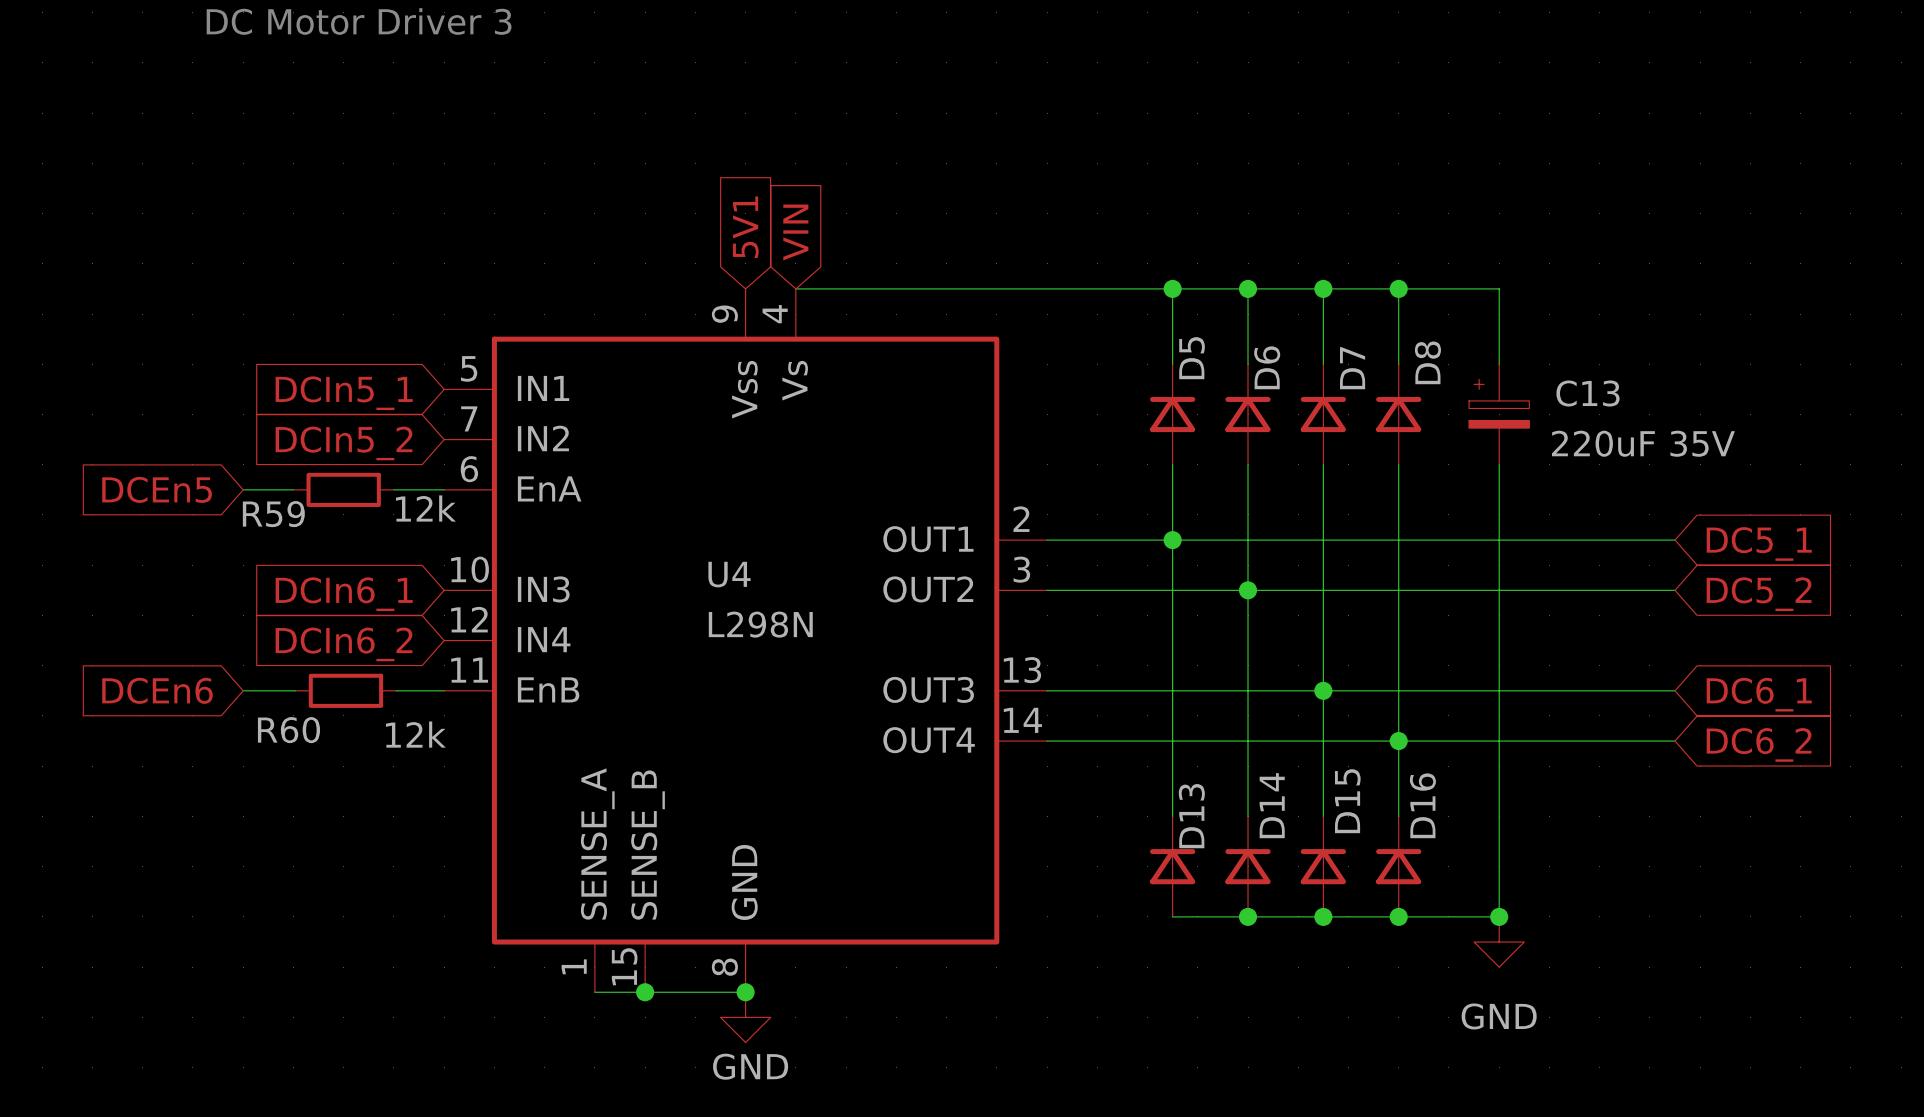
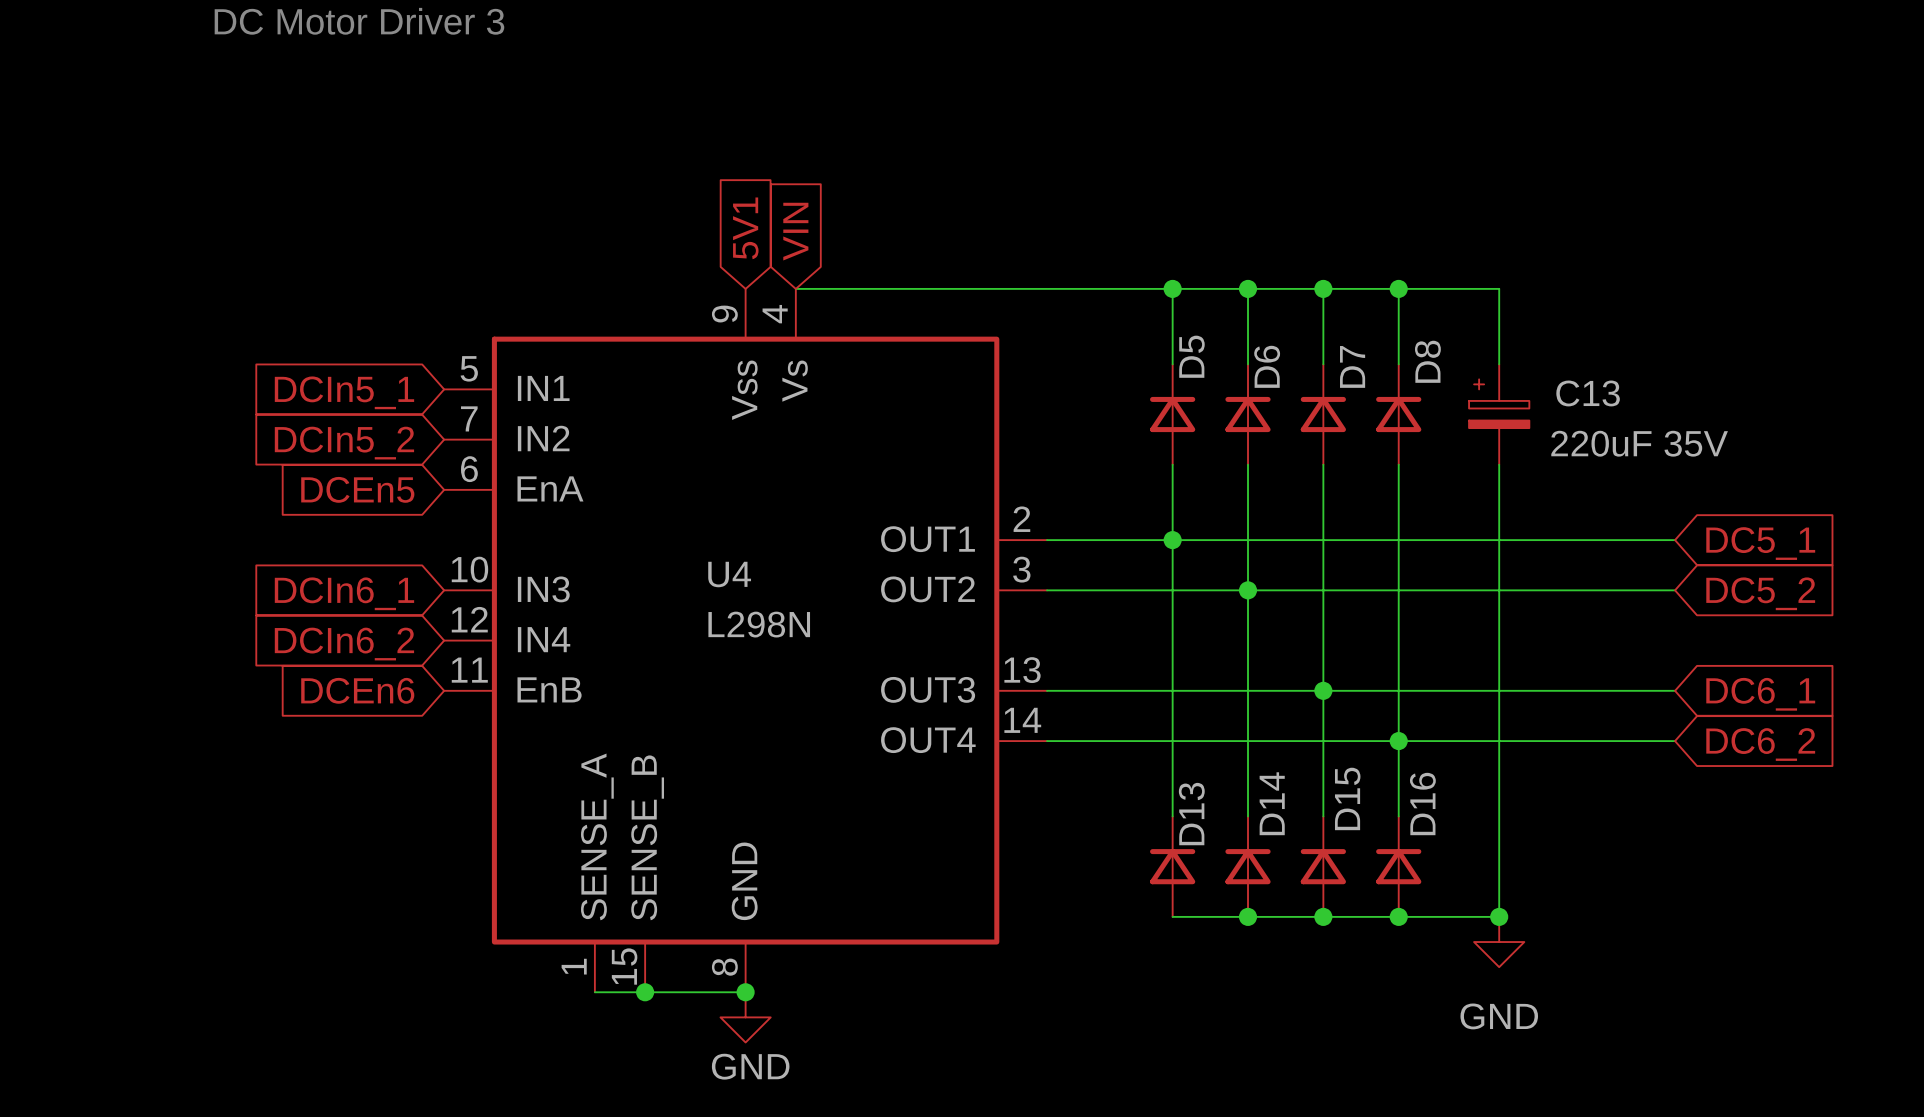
global label position: DCEn5 (157, 489) -> DCEn5 (357, 489)
wire: (243, 489) (293, 489) -> none
R59: 12k (343, 489) -> none
wire: (393, 489) (444, 489) -> none
global label position: DCEn6 (157, 690) -> DCEn6 (357, 690)
wire: (243, 690) (295, 690) -> none
R60: 12k (345, 690) -> none
wire: (396, 690) (444, 690) -> none

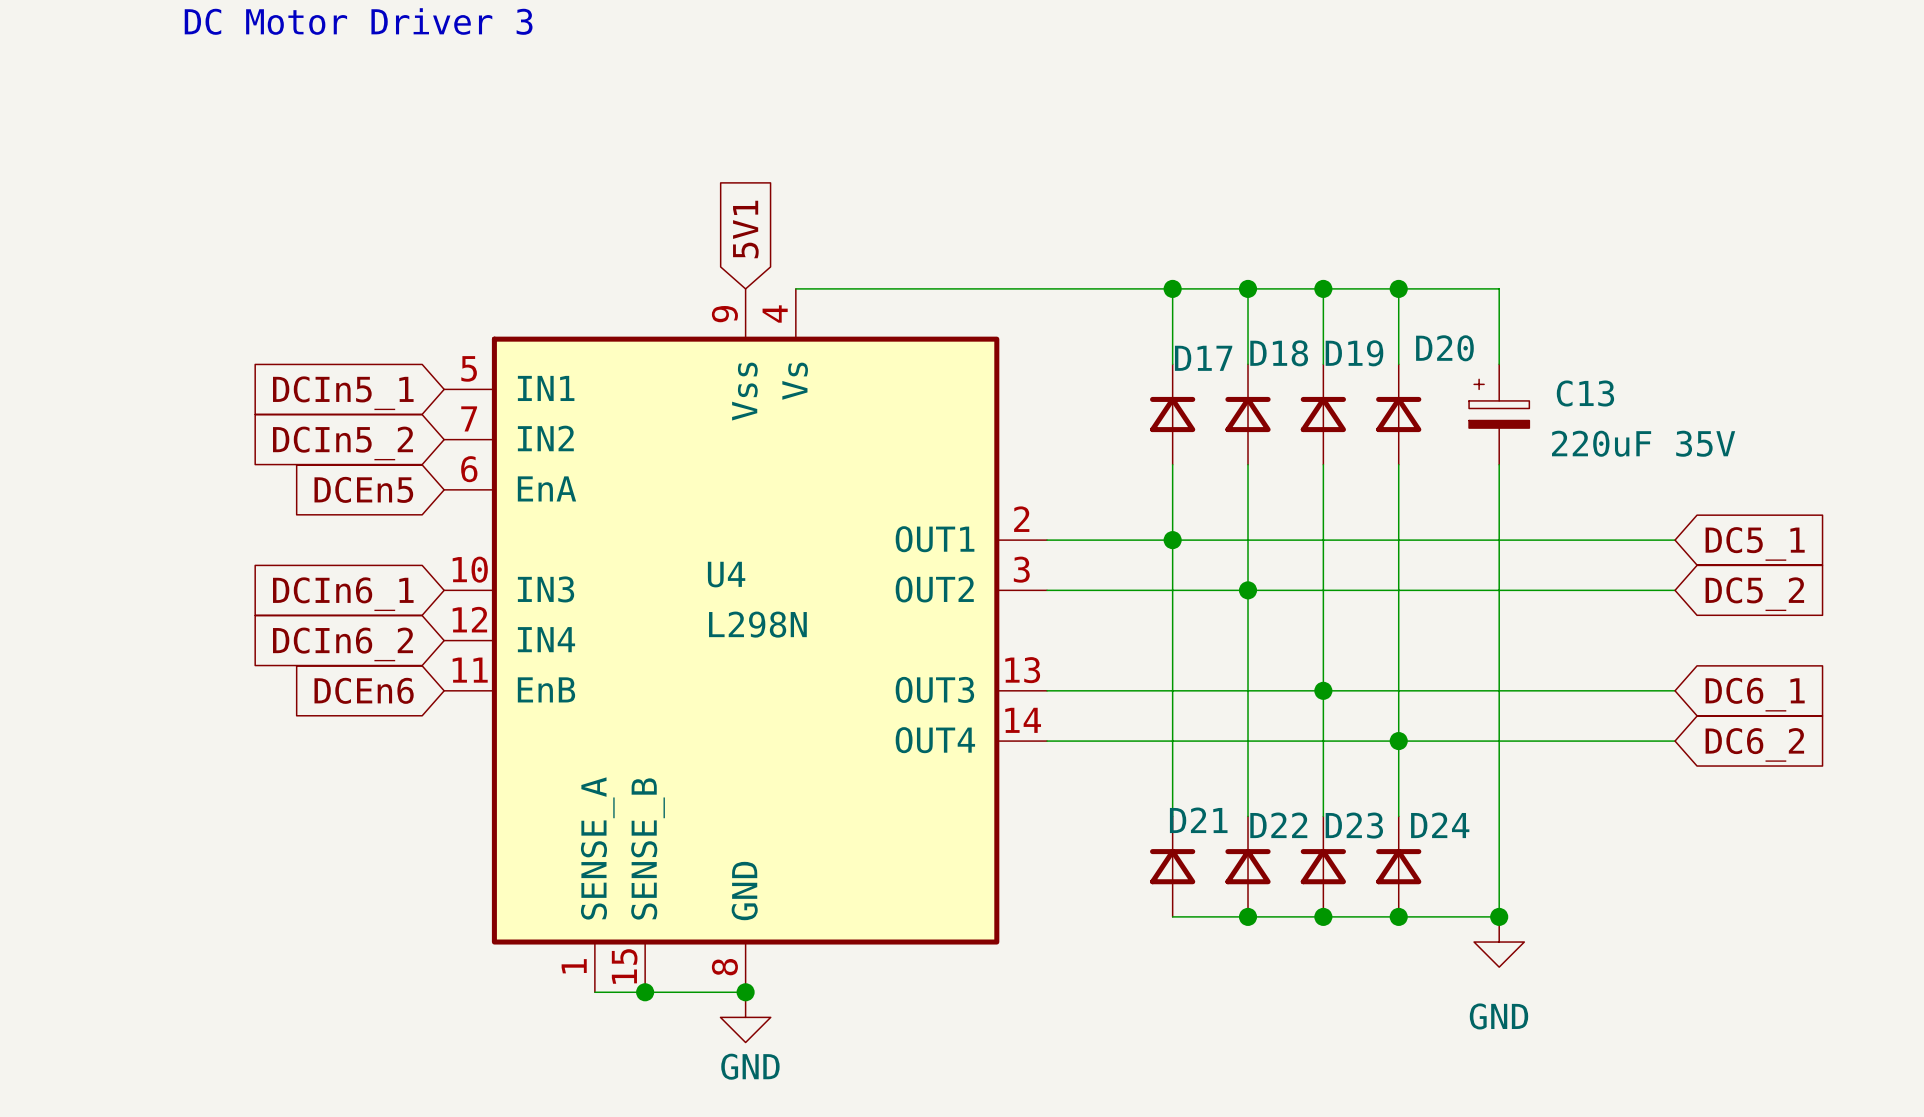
global label: VIN (795, 231) -> none
D5 name: D5 (1191, 356) -> D17 (1203, 358)
D8 name: D8 (1427, 361) -> D20 (1444, 348)
D6 name: D6 (1267, 366) -> D18 (1279, 353)
D7 name: D7 (1352, 366) -> D19 (1354, 353)
D15 name: D15 (1347, 798) -> D23 (1354, 825)
D14 name: D14 (1272, 803) -> D22 (1278, 825)
D16 name: D16 (1422, 804) -> D24 (1440, 825)
D13 name: D13 (1191, 814) -> D21 (1198, 820)

